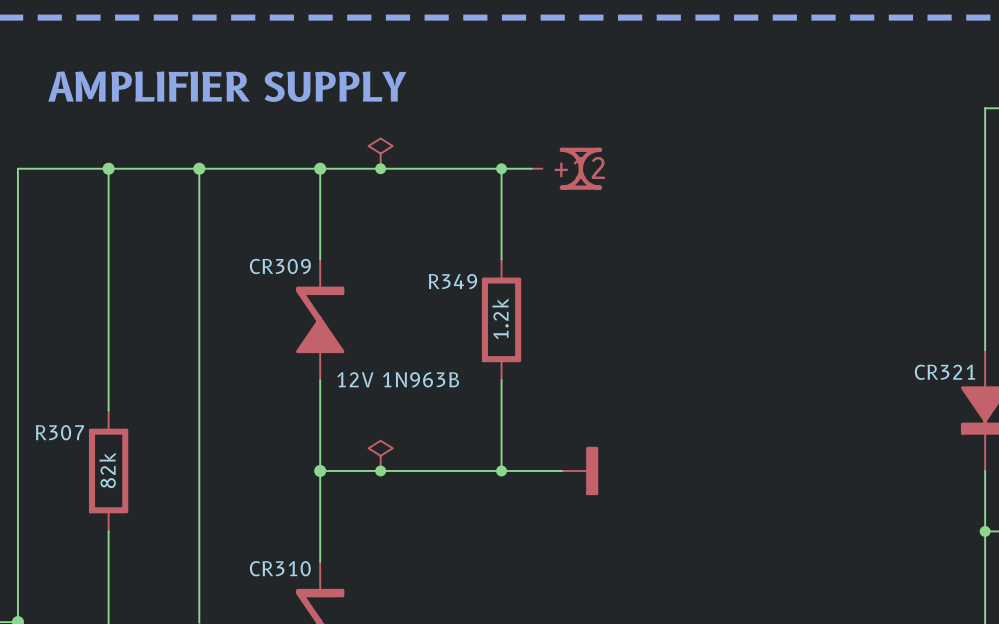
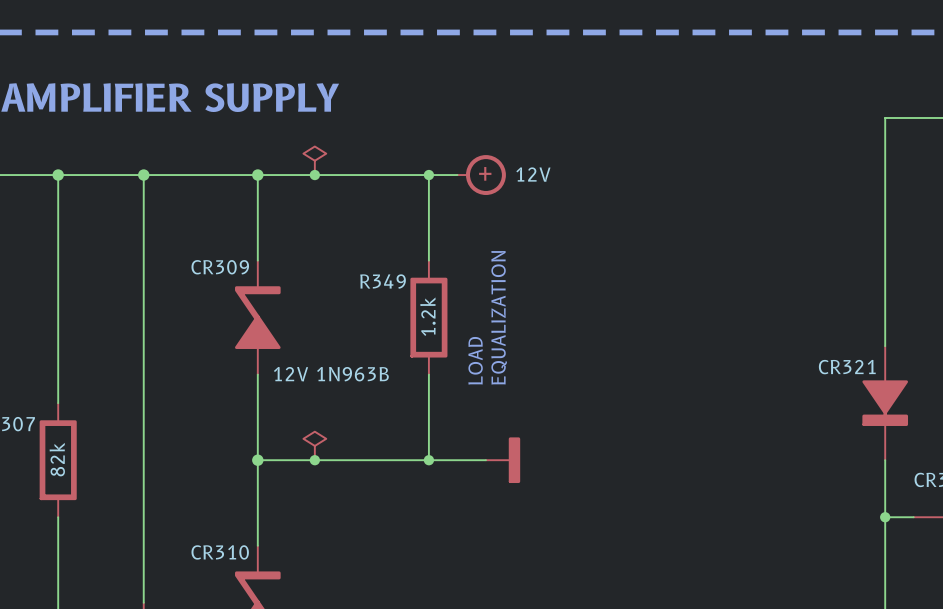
power symbol shape: [531, 147, 603, 190] -> [457, 155, 506, 195]
power symbol text: none -> 12V (533, 174)
text: none -> EQUALIZATION (499, 317)
text: none -> LOAD (475, 360)

